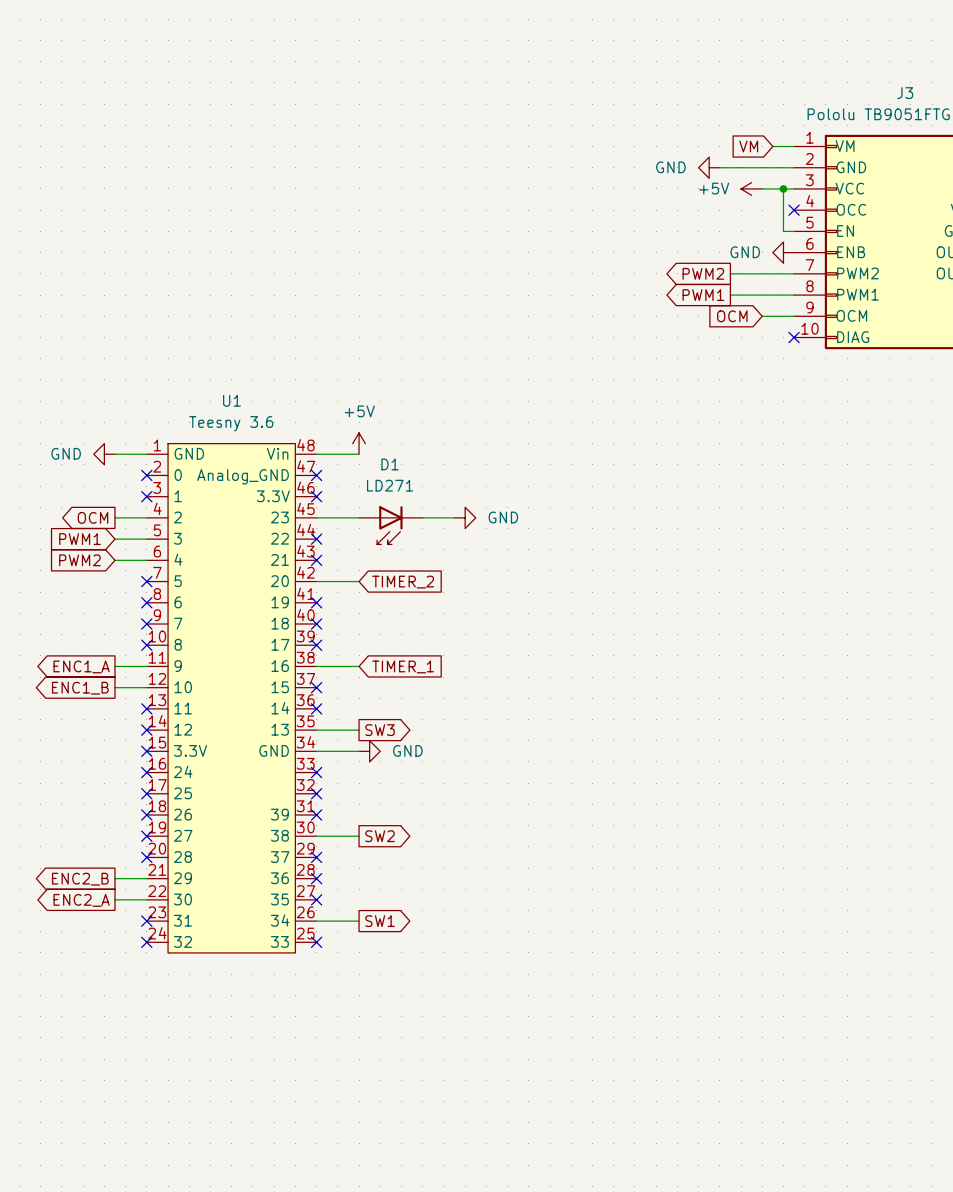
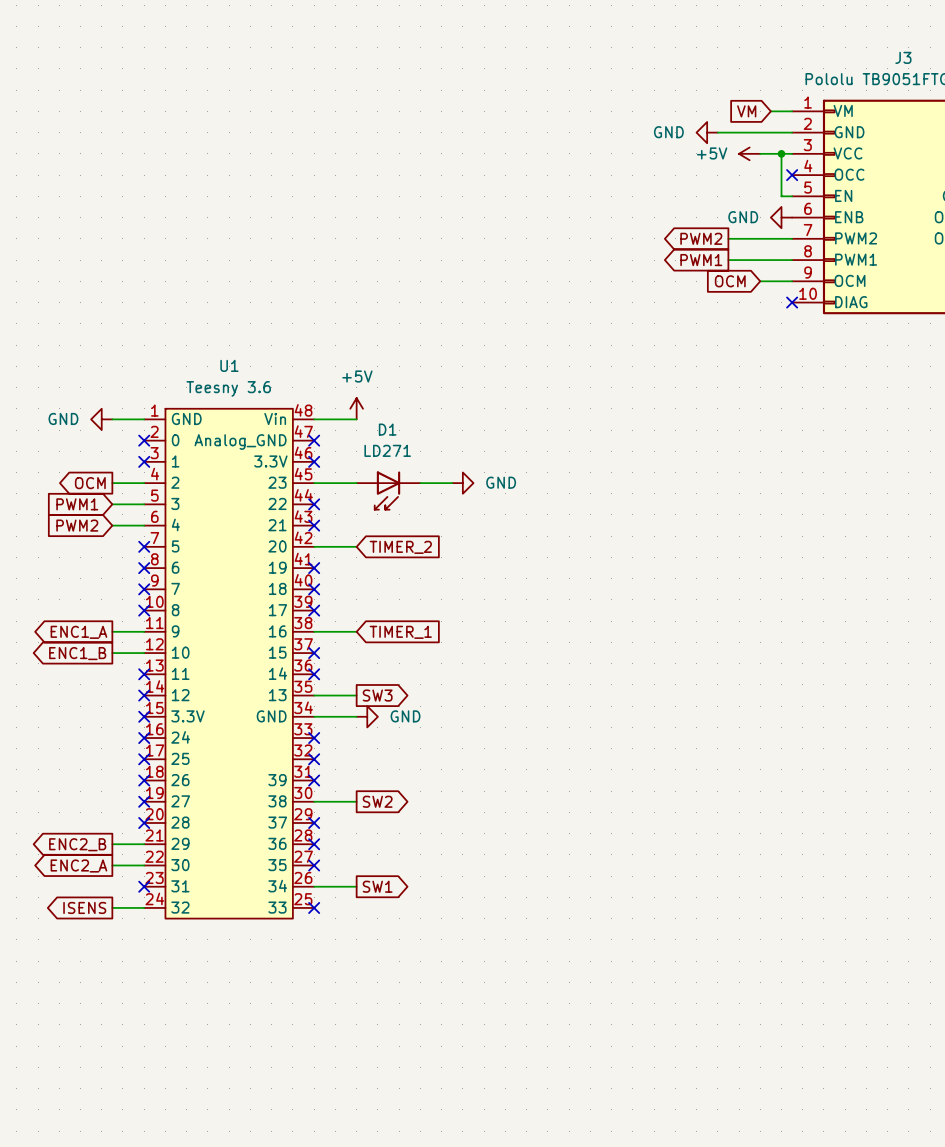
global label: none -> ISENS (84, 907)
wire: none -> (112, 907) (144, 907)
no-connect mark: (146, 942) -> none

